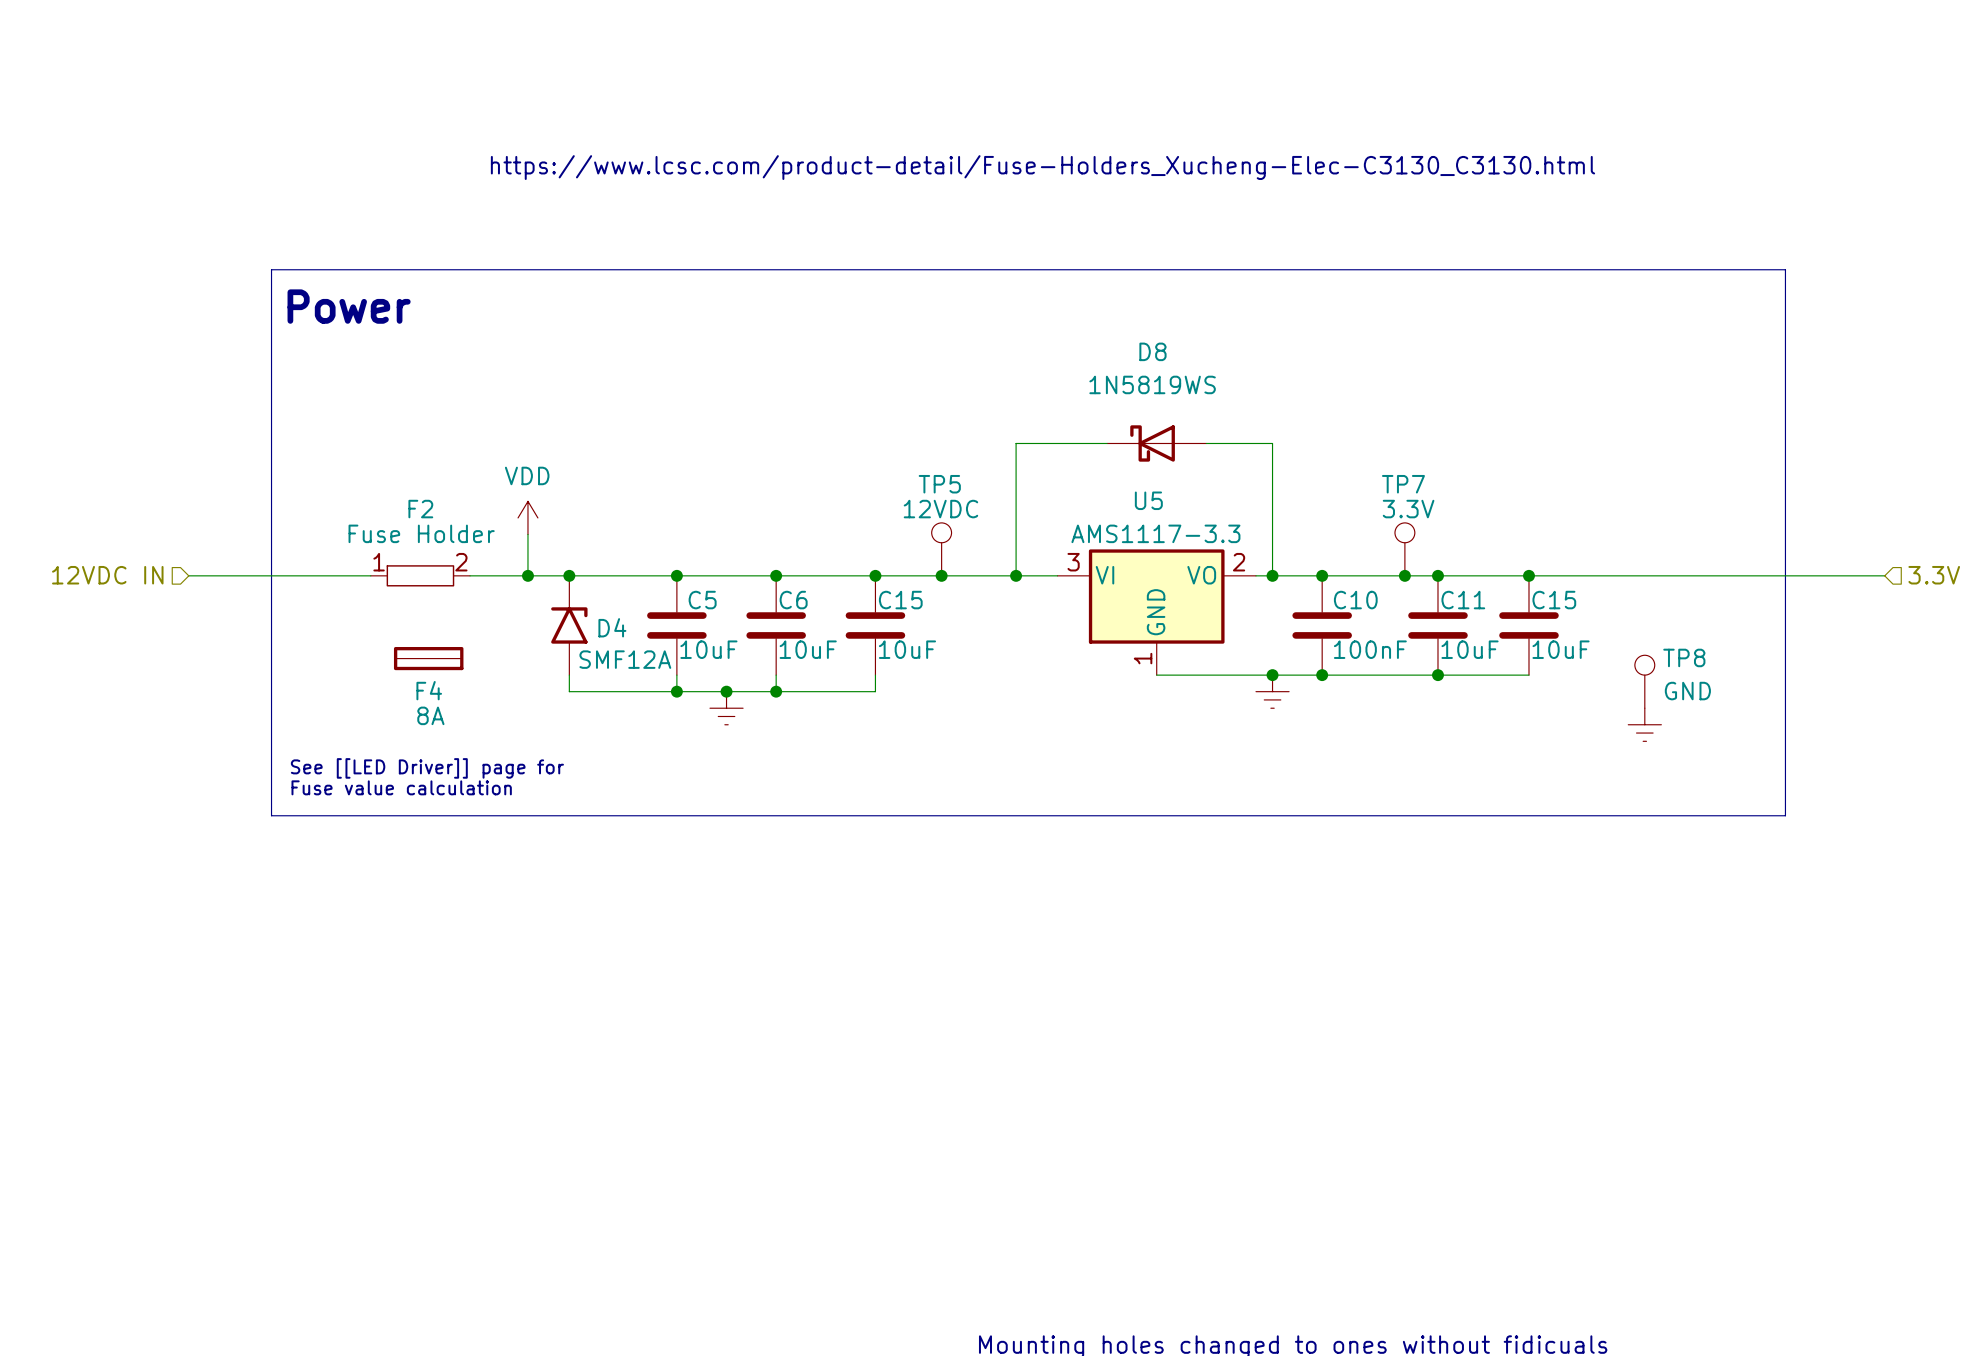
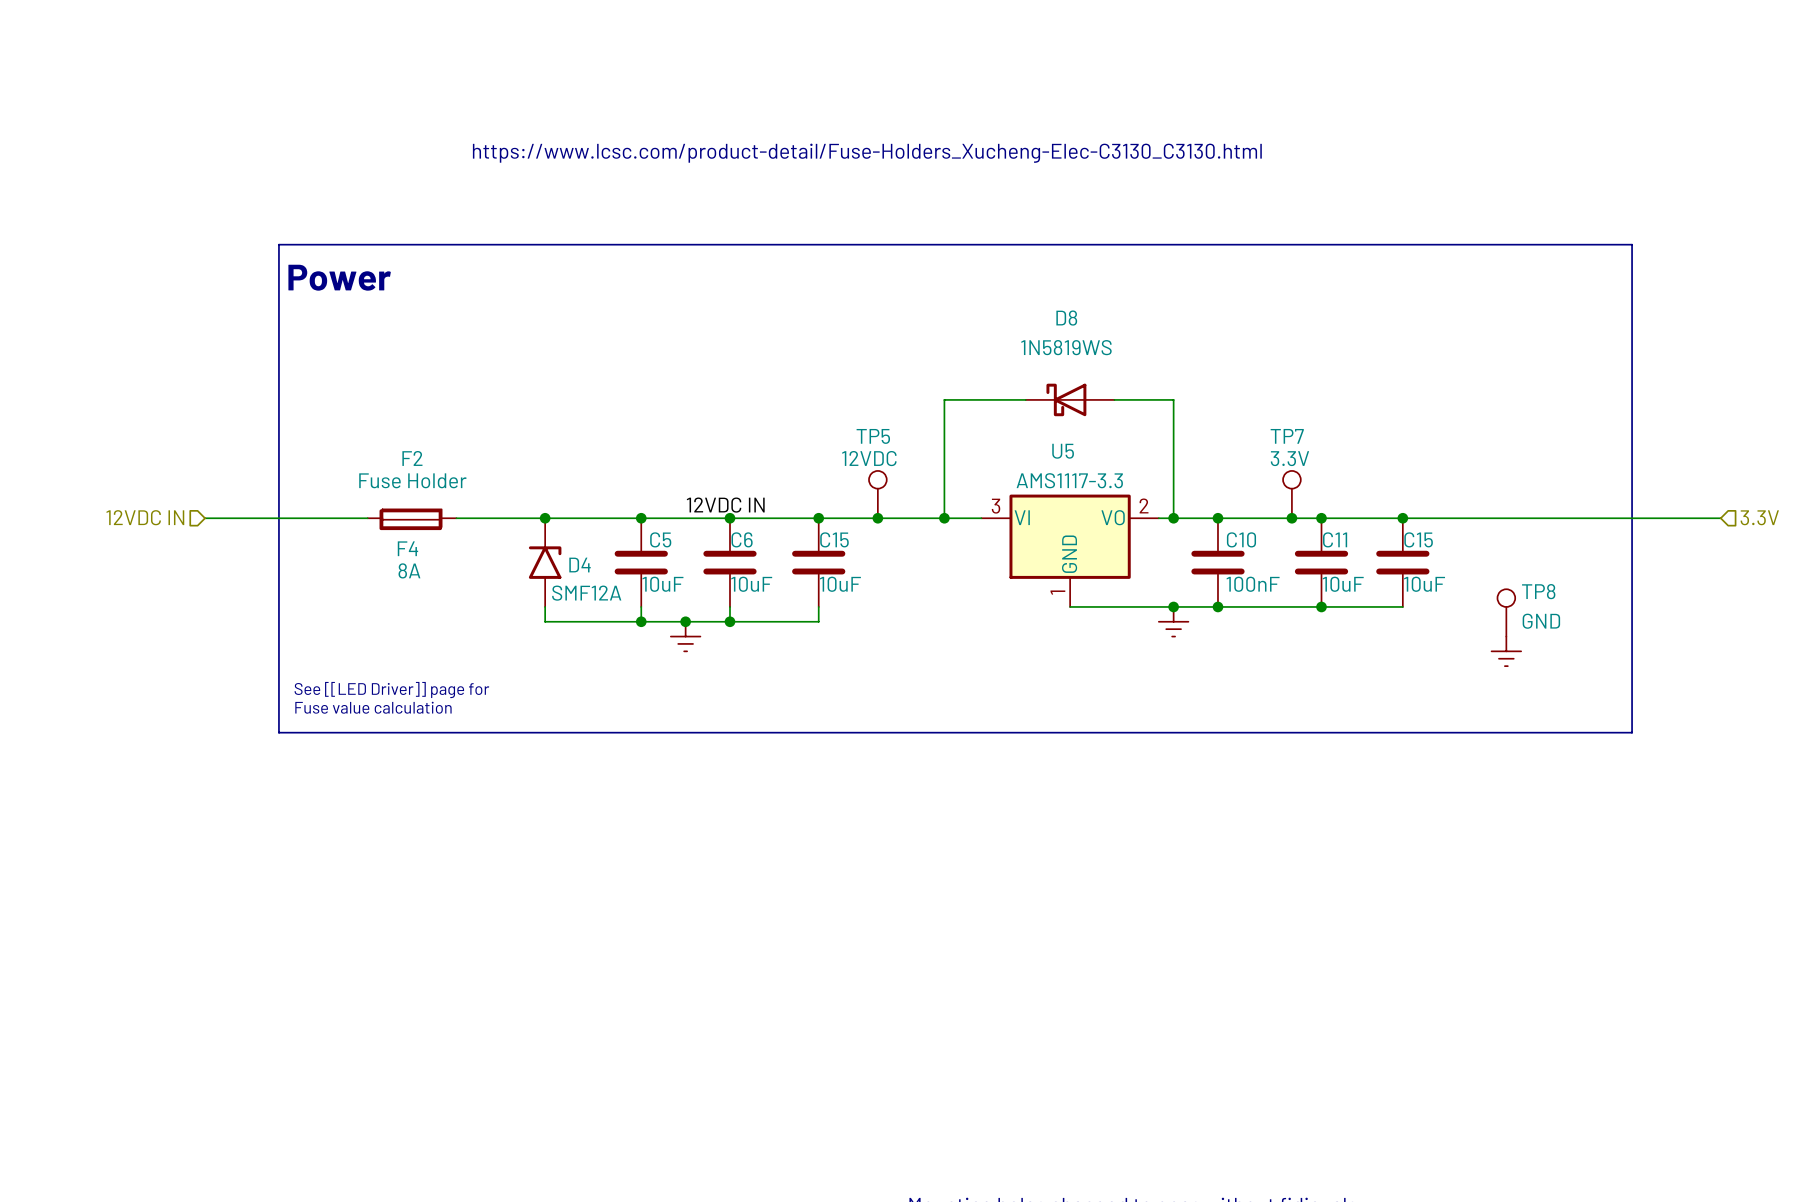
power symbol: VDD (527, 517) -> none
wire: (527, 534) (527, 575) -> none
label: none -> 12VDC IN (725, 505)
F2 pin number: 1 (379, 562) -> none
F2 pin number: 2 (461, 562) -> none
junction: (527, 575) -> none
F4 position: (428, 658) -> (410, 519)

